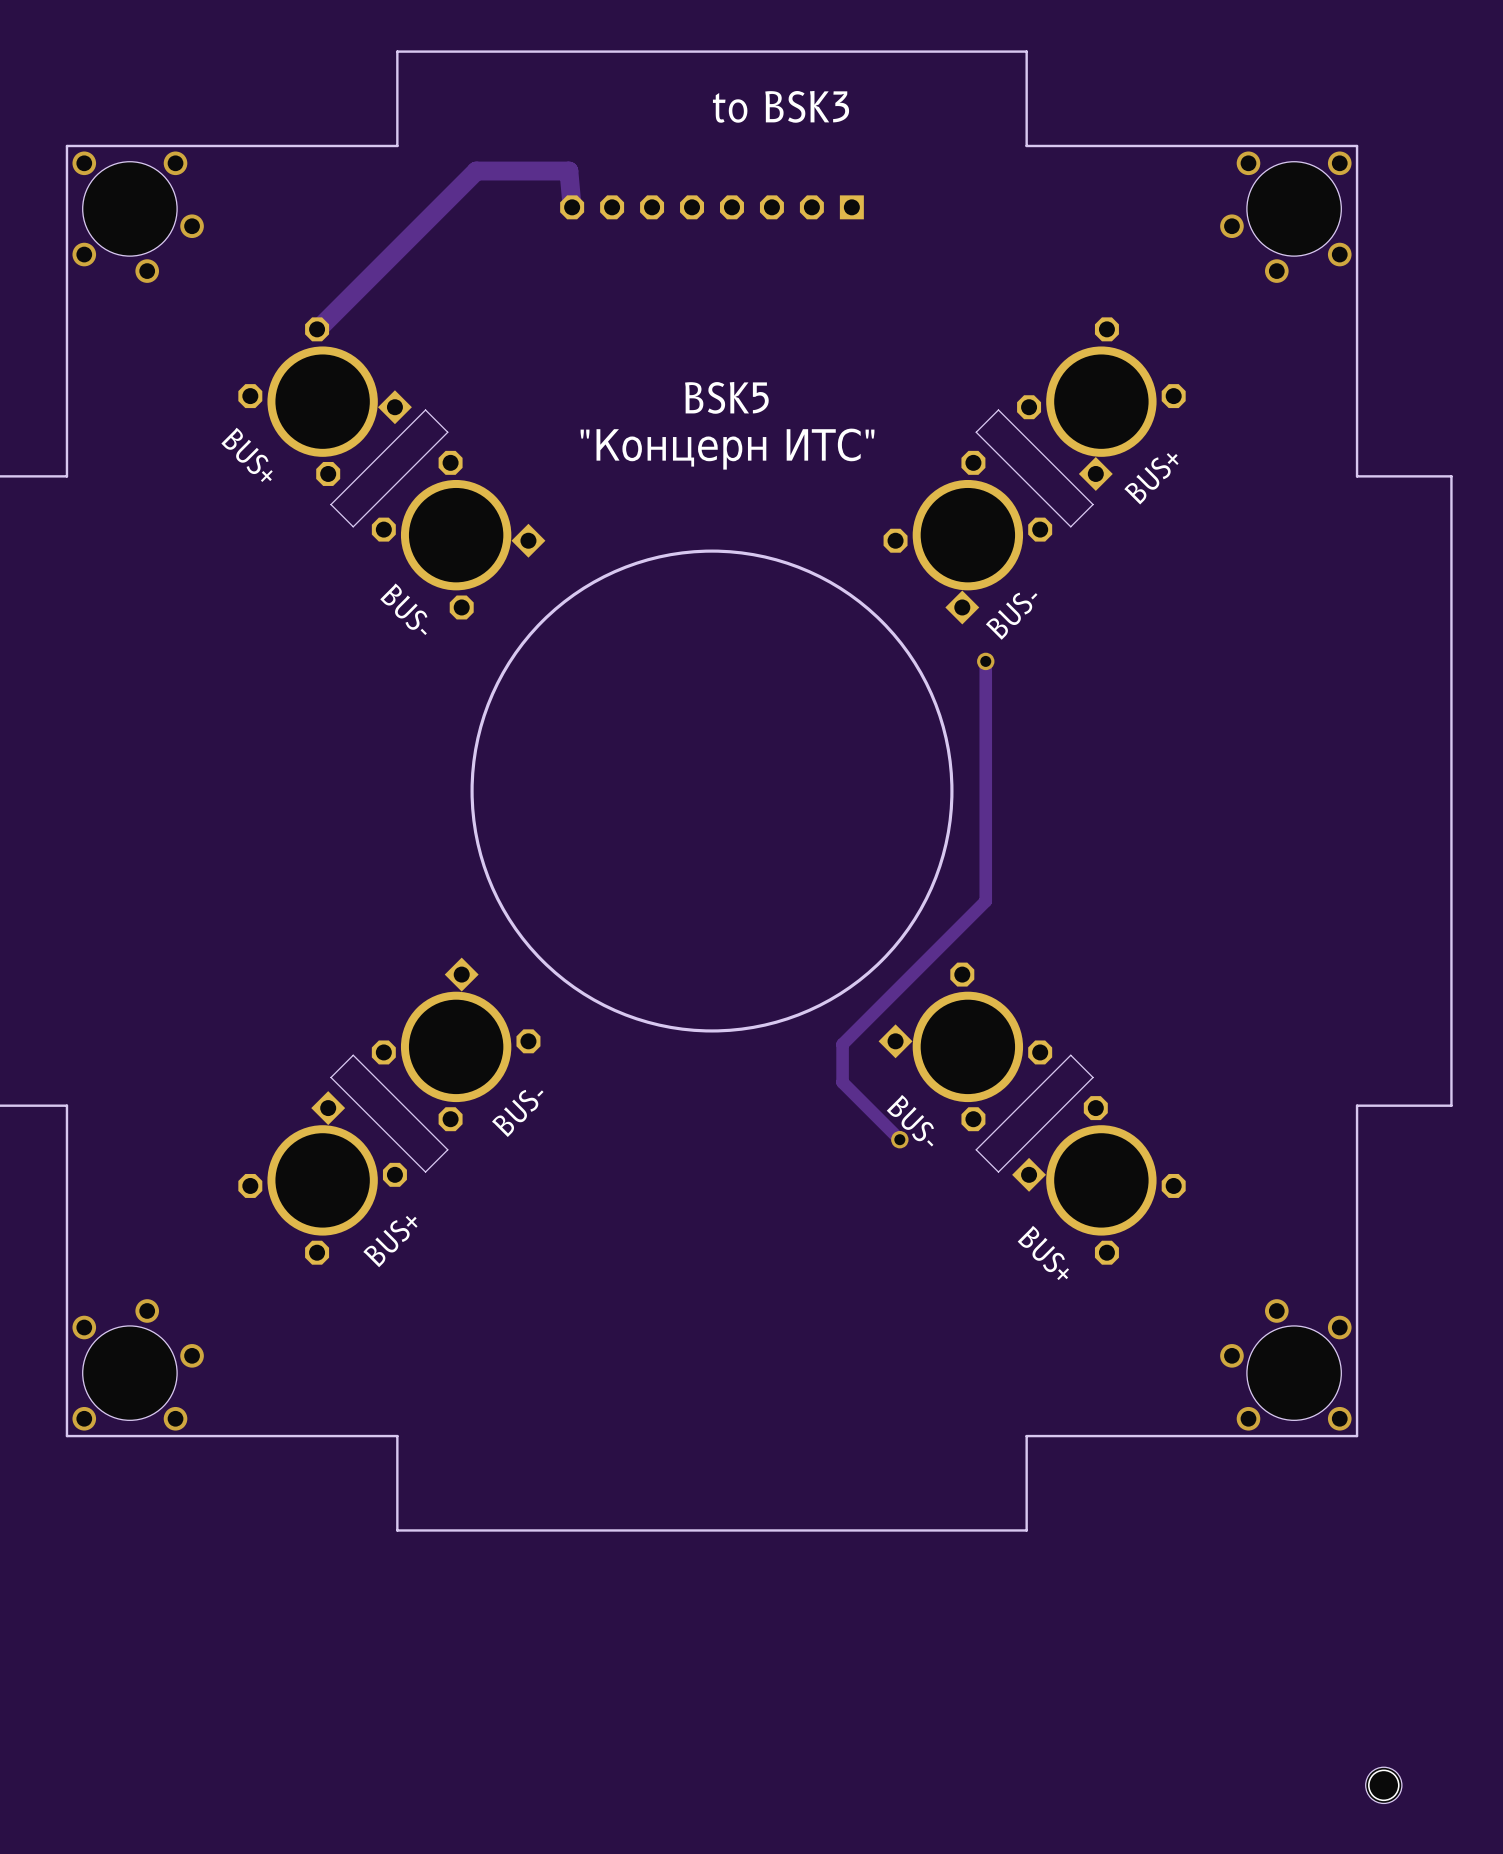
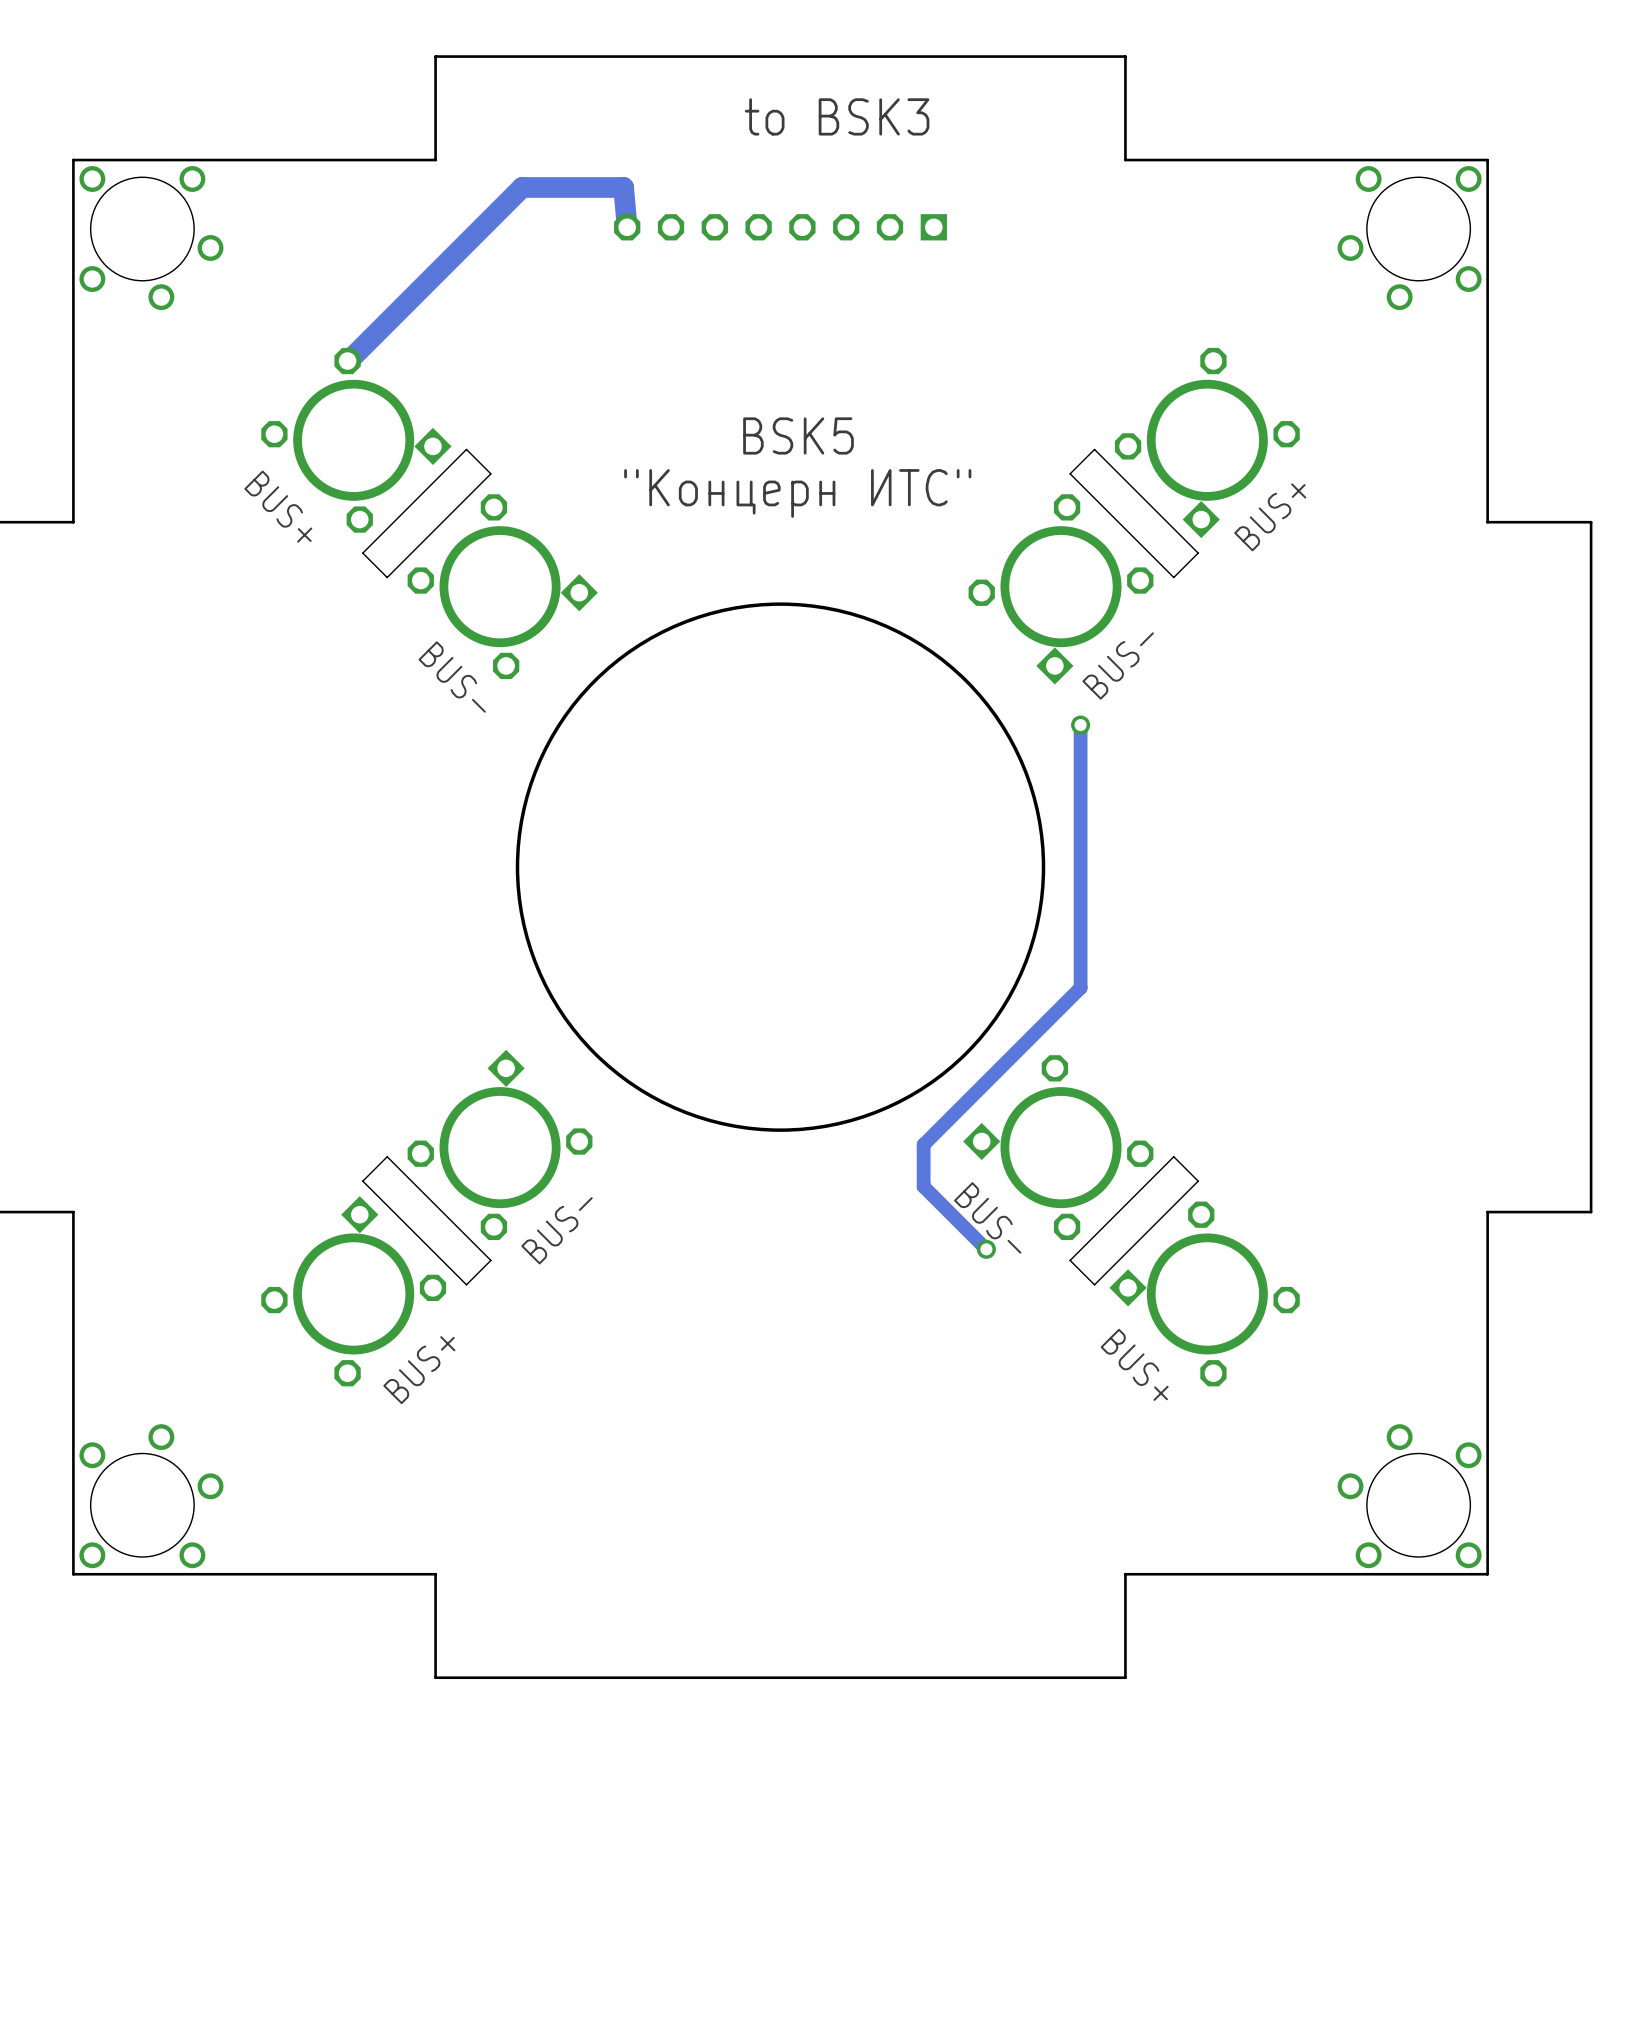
part: (1383, 1785) -> none

